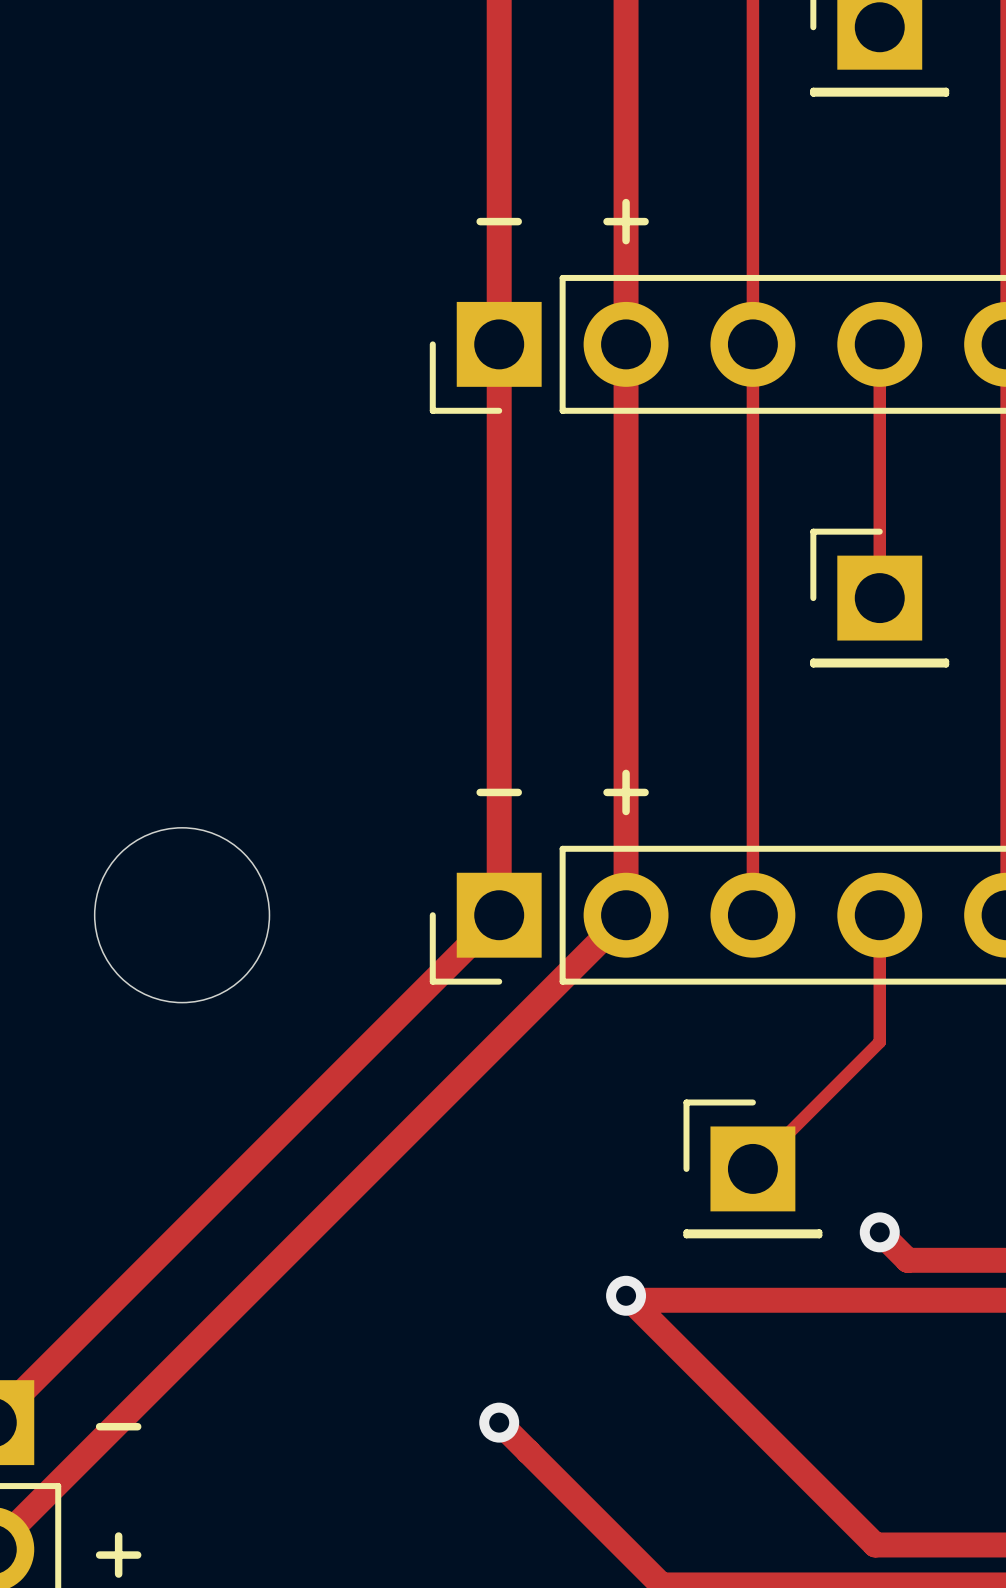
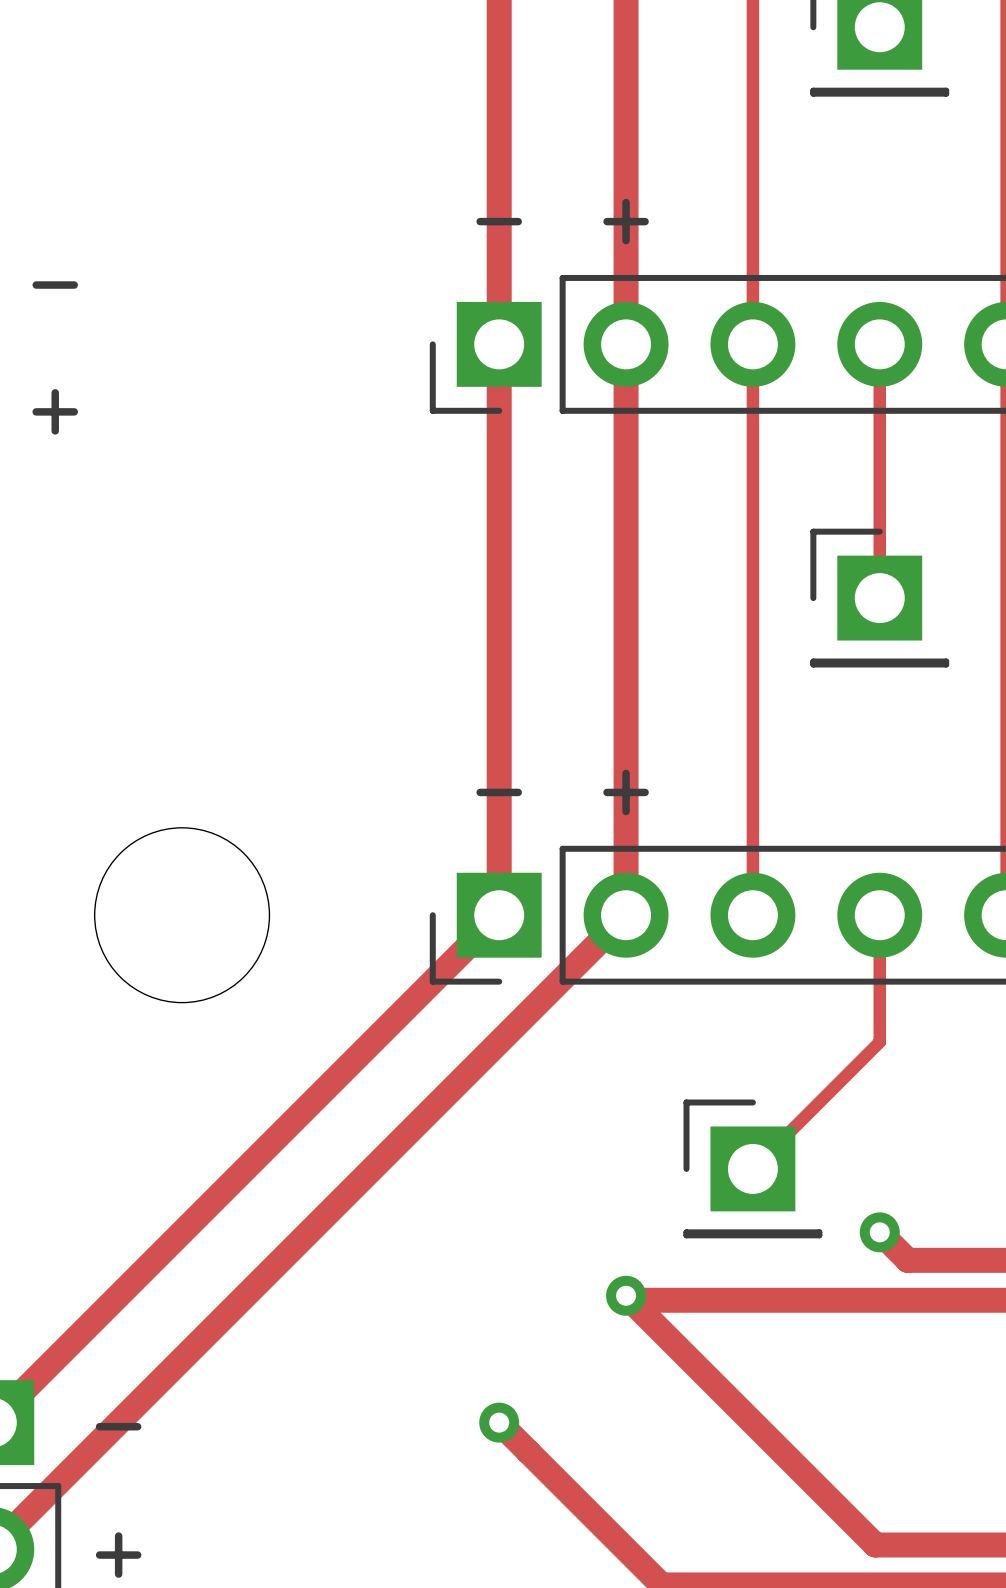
text: none -> - (55, 285)
text: none -> + (55, 411)

